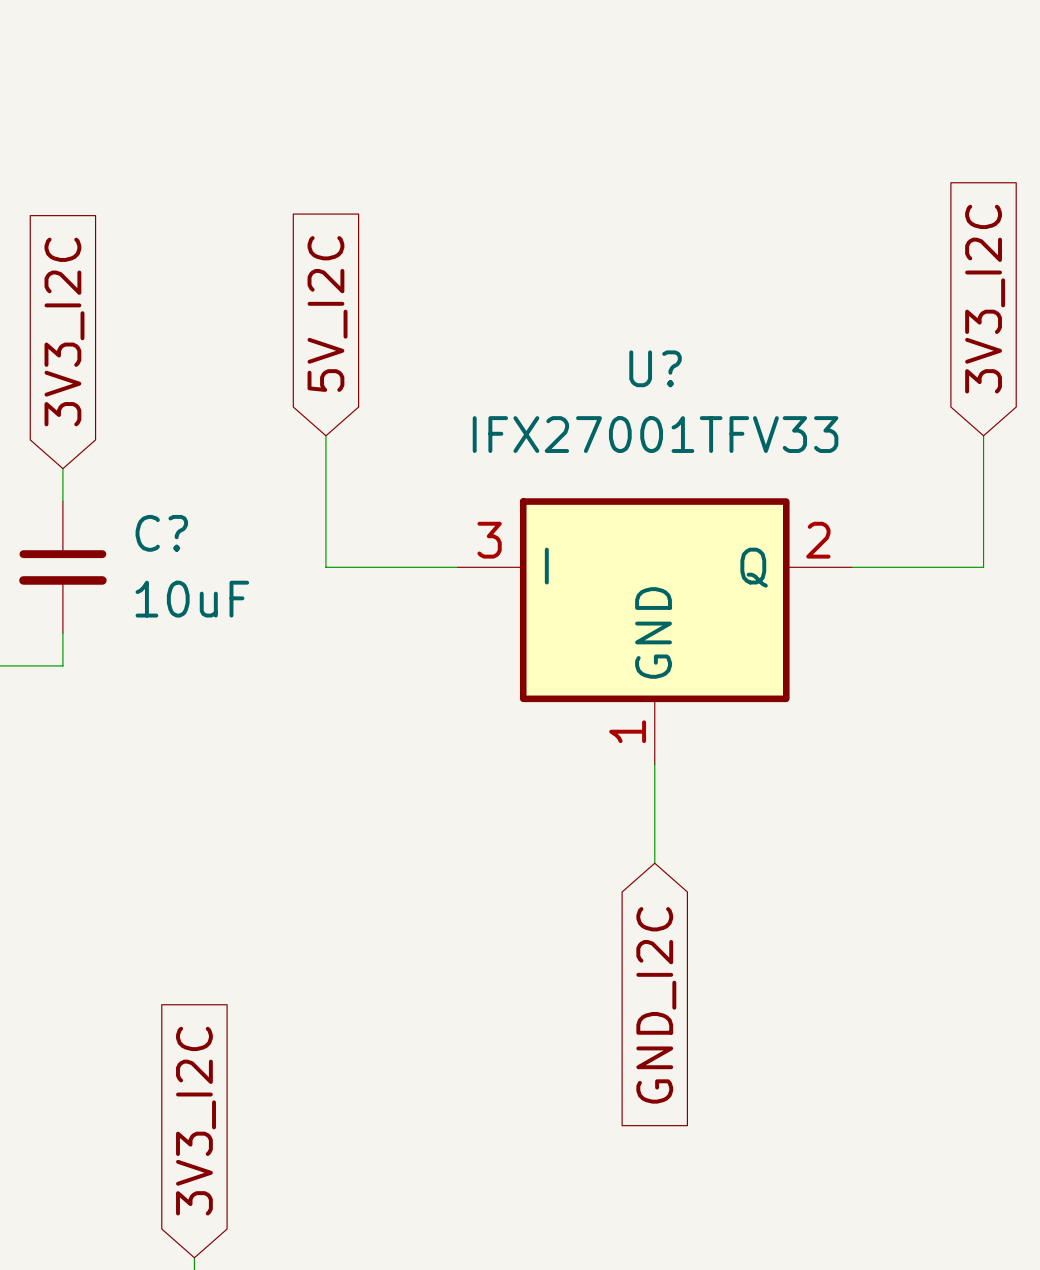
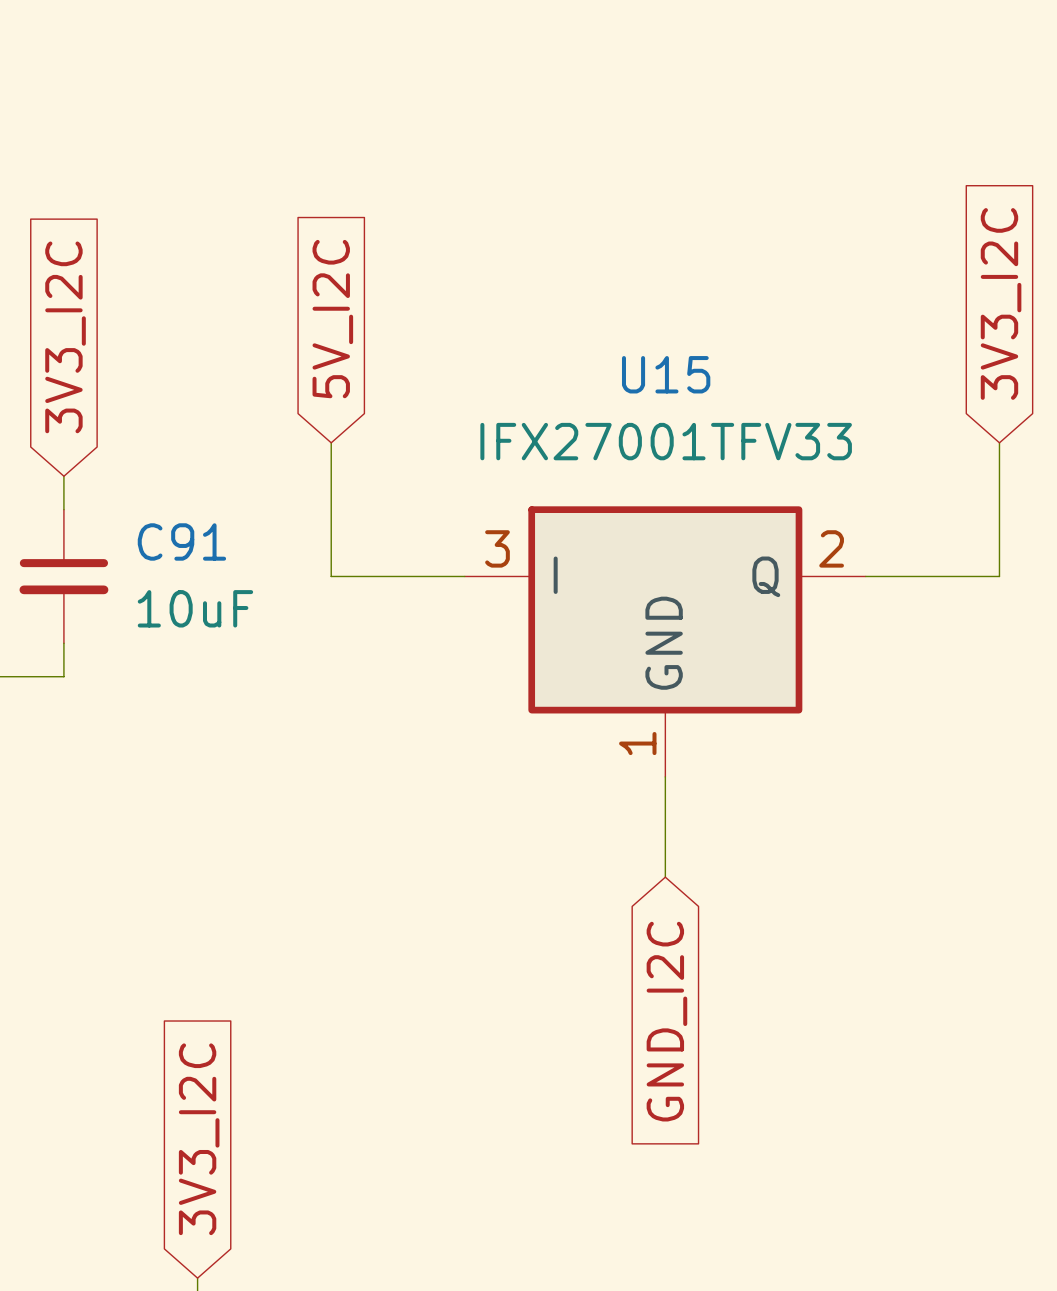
U? name: U? (655, 368) -> U15 (666, 374)
C? name: C? (161, 533) -> C91 (181, 541)

